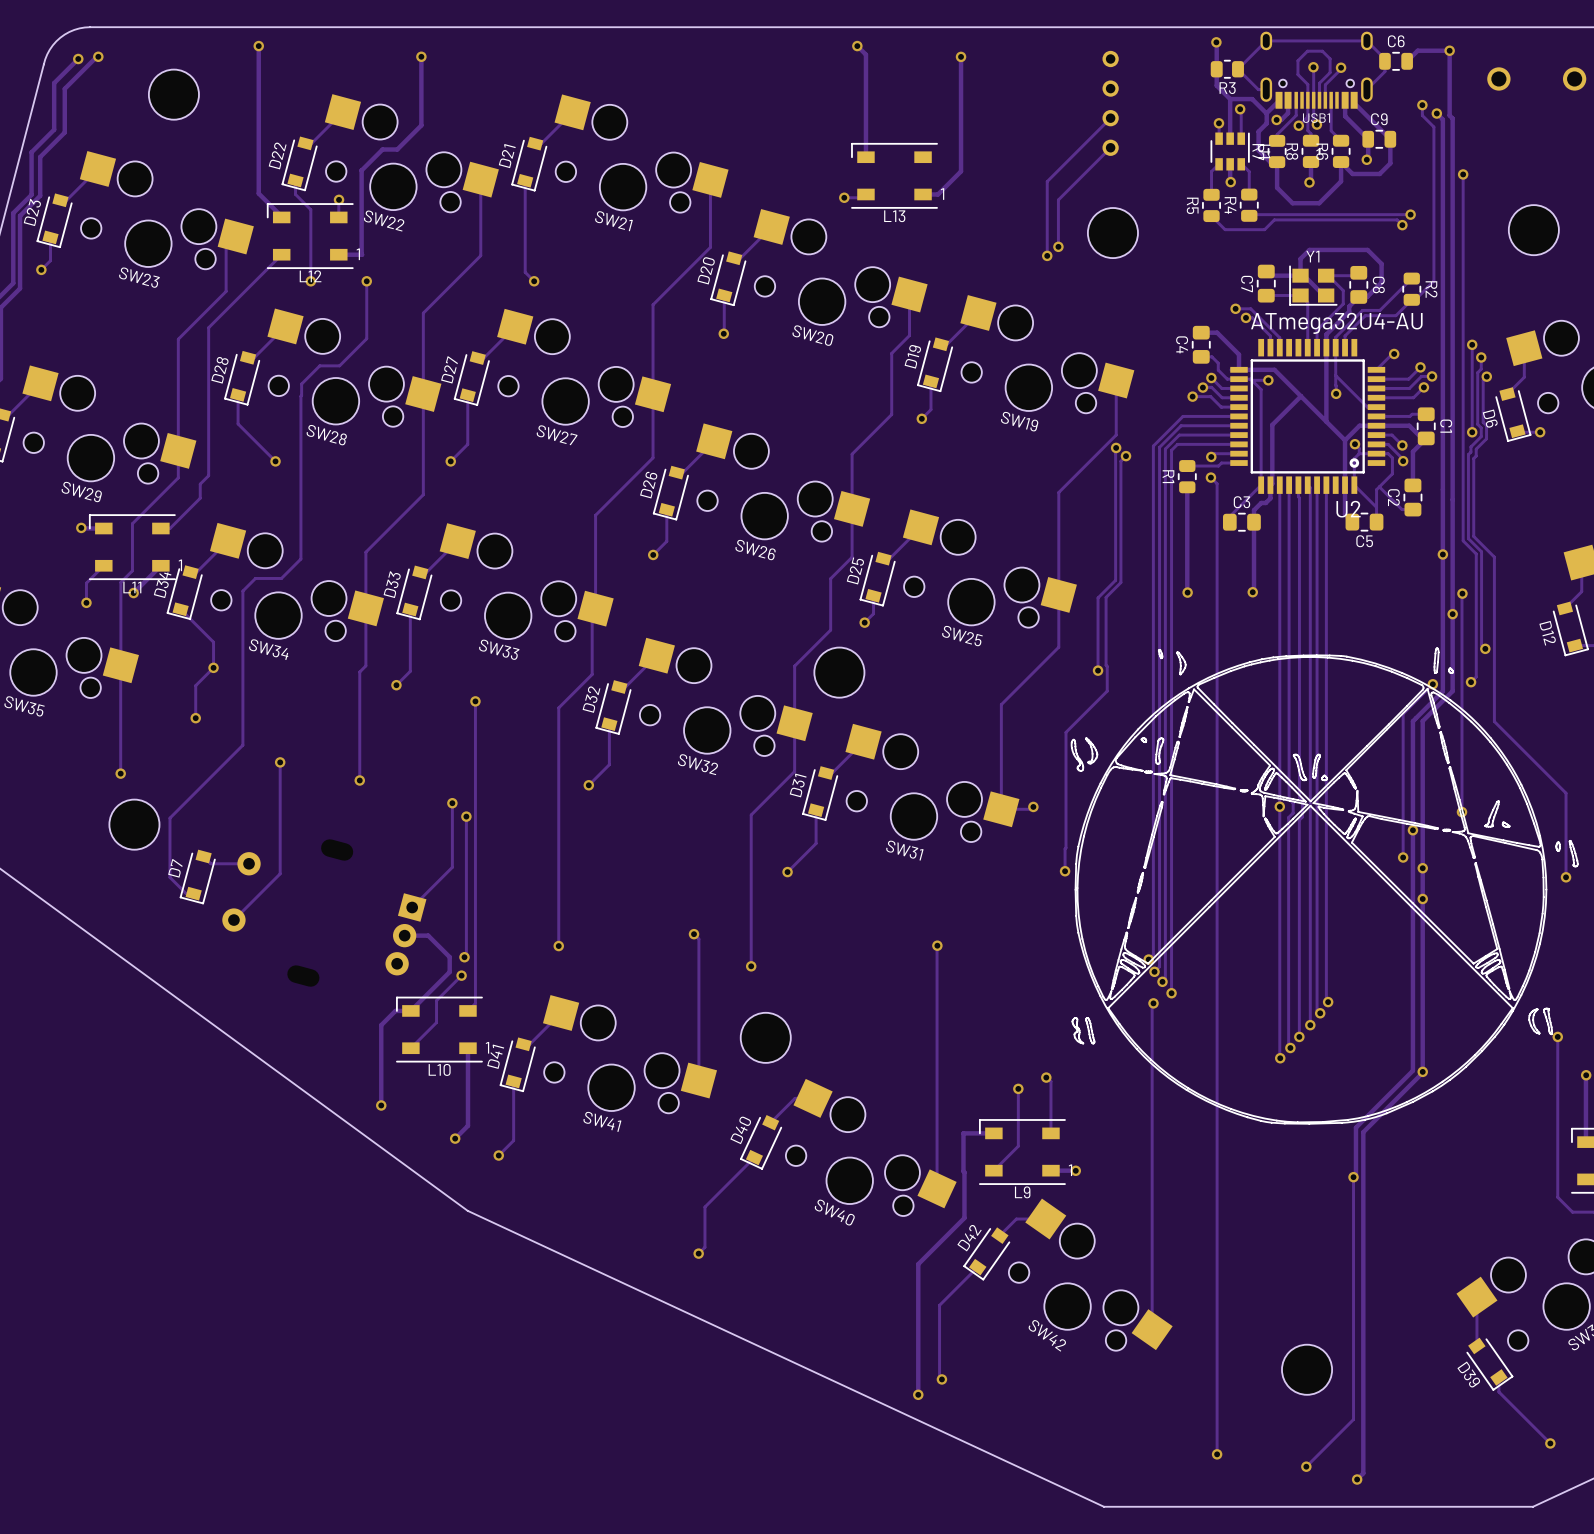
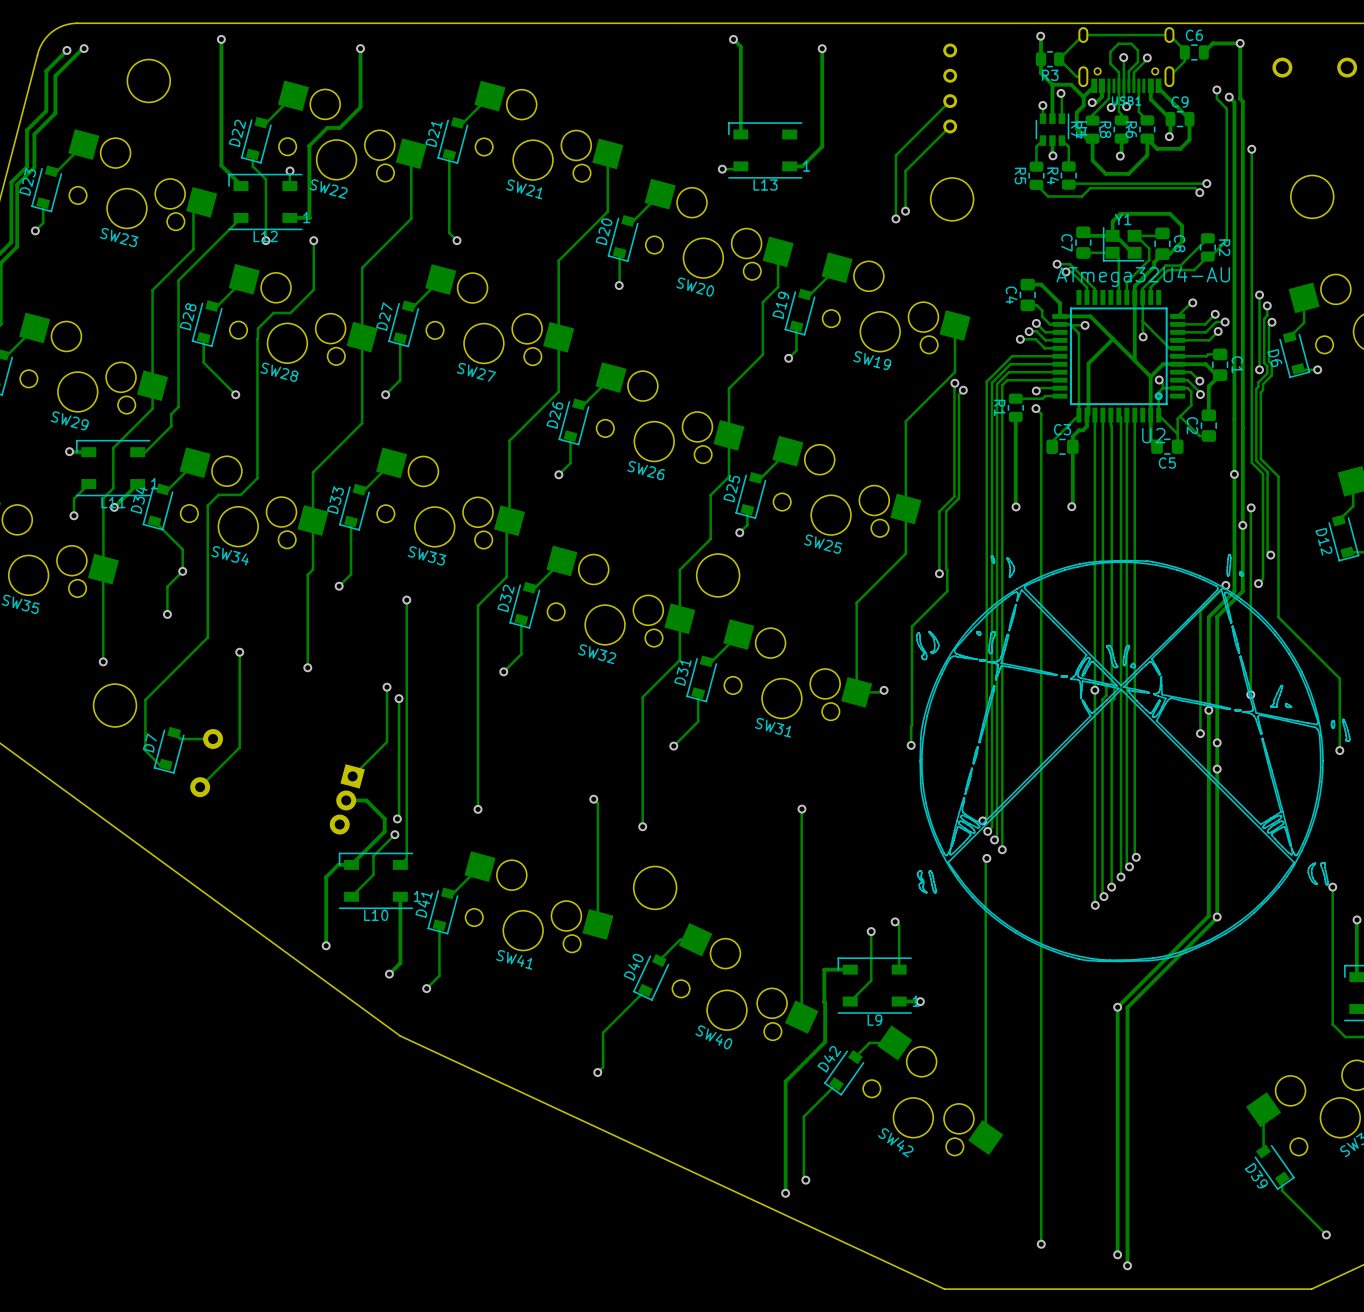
track: (1355, 1127) (1355, 1174) (1353, 1177) (1353, 1419) (1306, 1466) -> (1160, 964) (1117, 1007) (1117, 1254)
track: (1363, 1132) (1363, 1473) (1357, 1479) -> (1166, 968) (1127, 1007) (1127, 1265)
via position: (1353, 1177) -> (1117, 1007)
part: (1307, 1369) -> none
via position: (1357, 1479) -> (1127, 1265)

